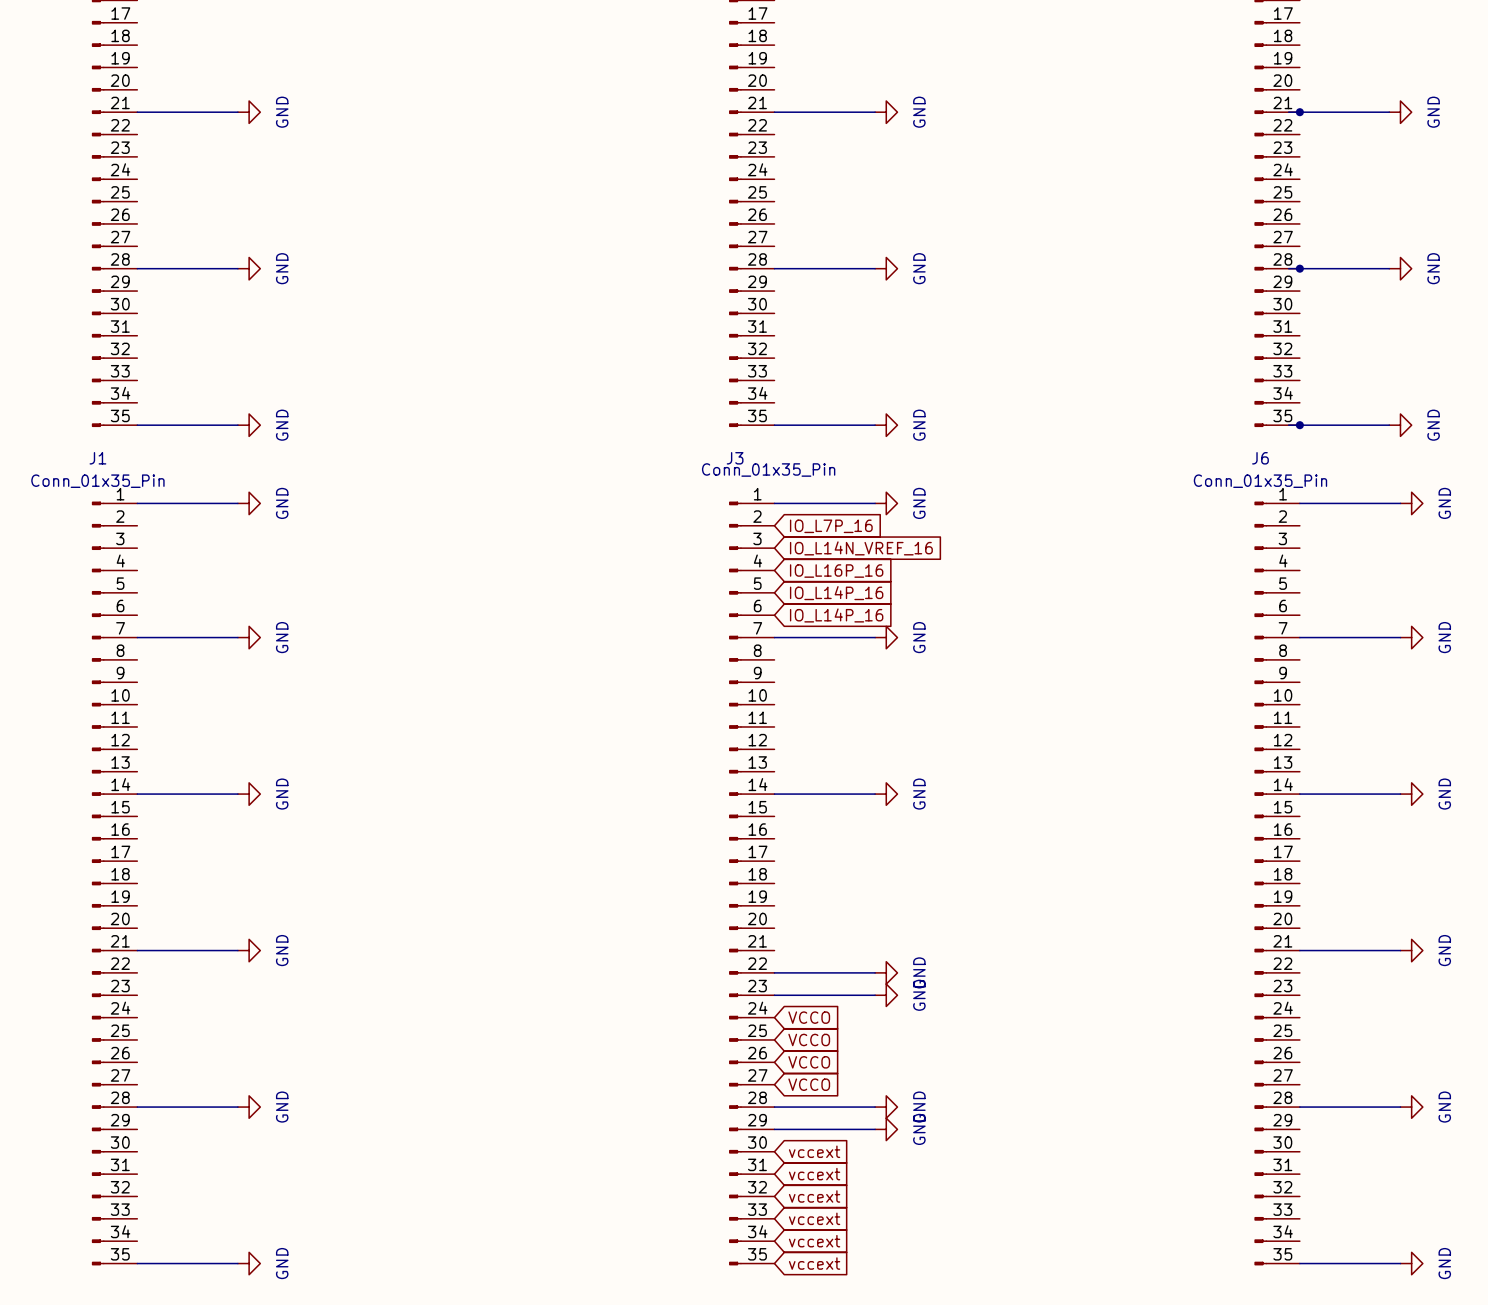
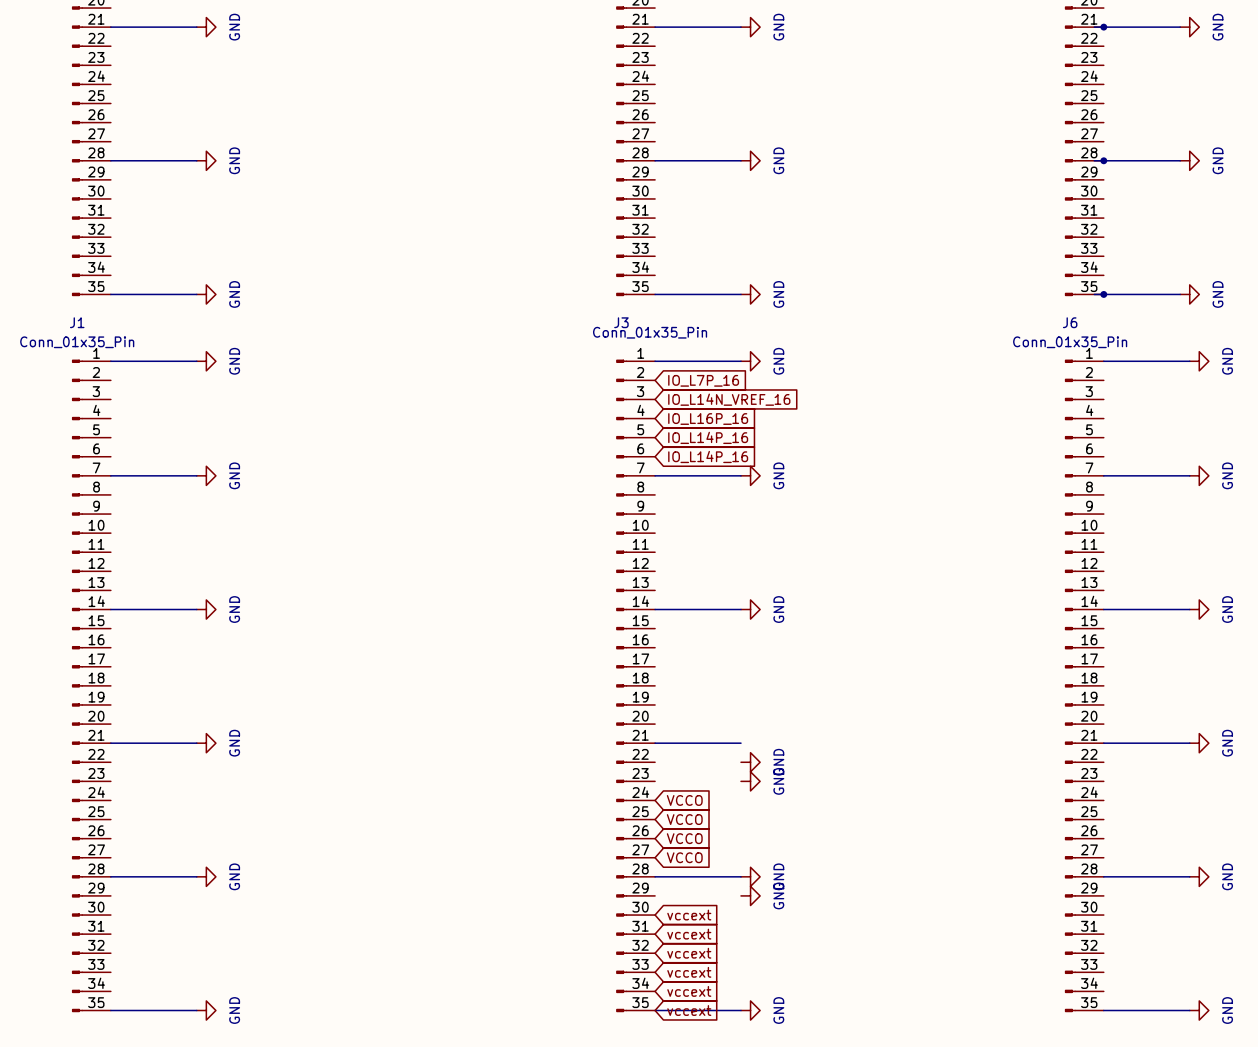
wire: (774, 972) (875, 972) -> (655, 743) (741, 743)
wire: (774, 995) (875, 995) -> none
wire: (774, 1129) (875, 1129) -> (655, 1010) (741, 1010)
power symbol: none -> GND (750, 1010)

